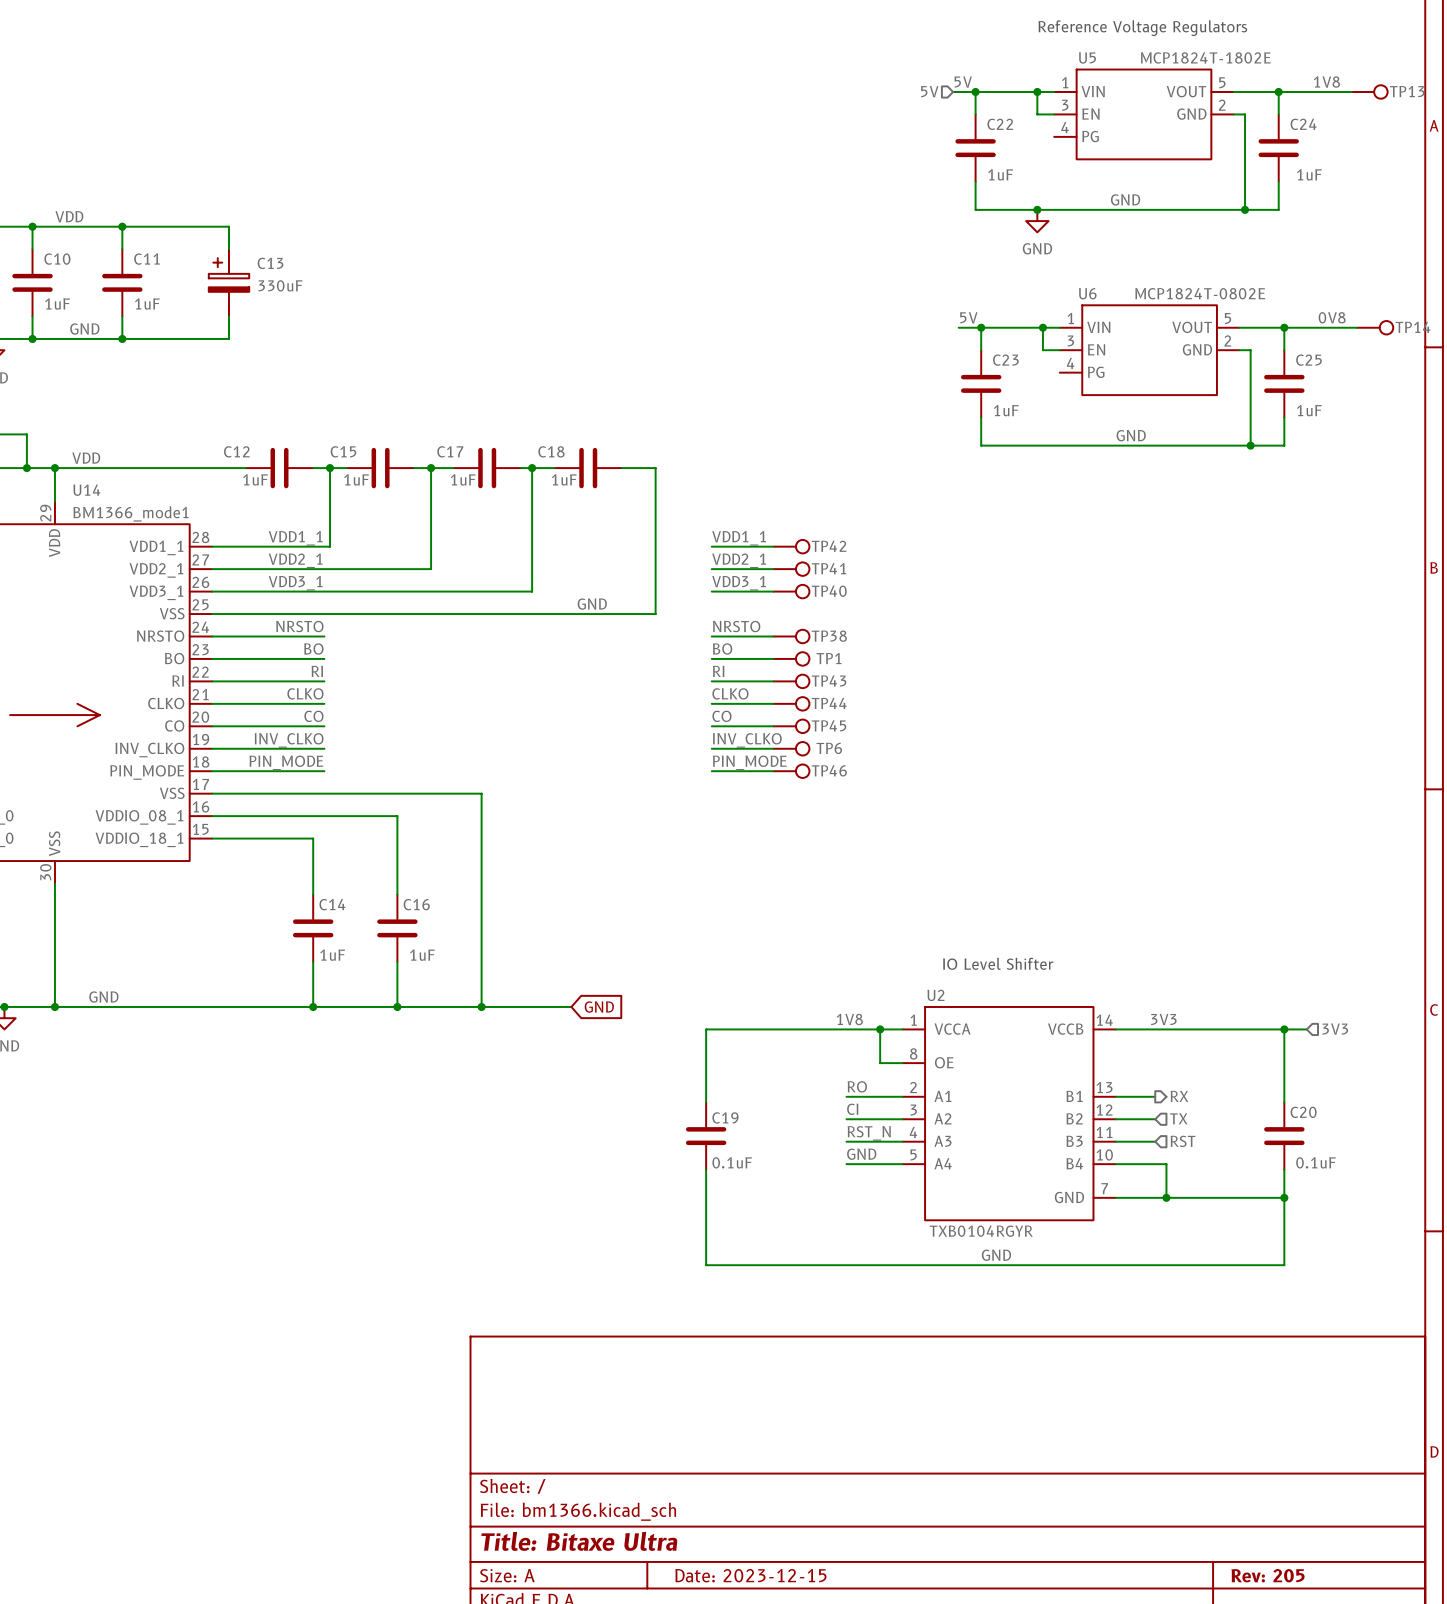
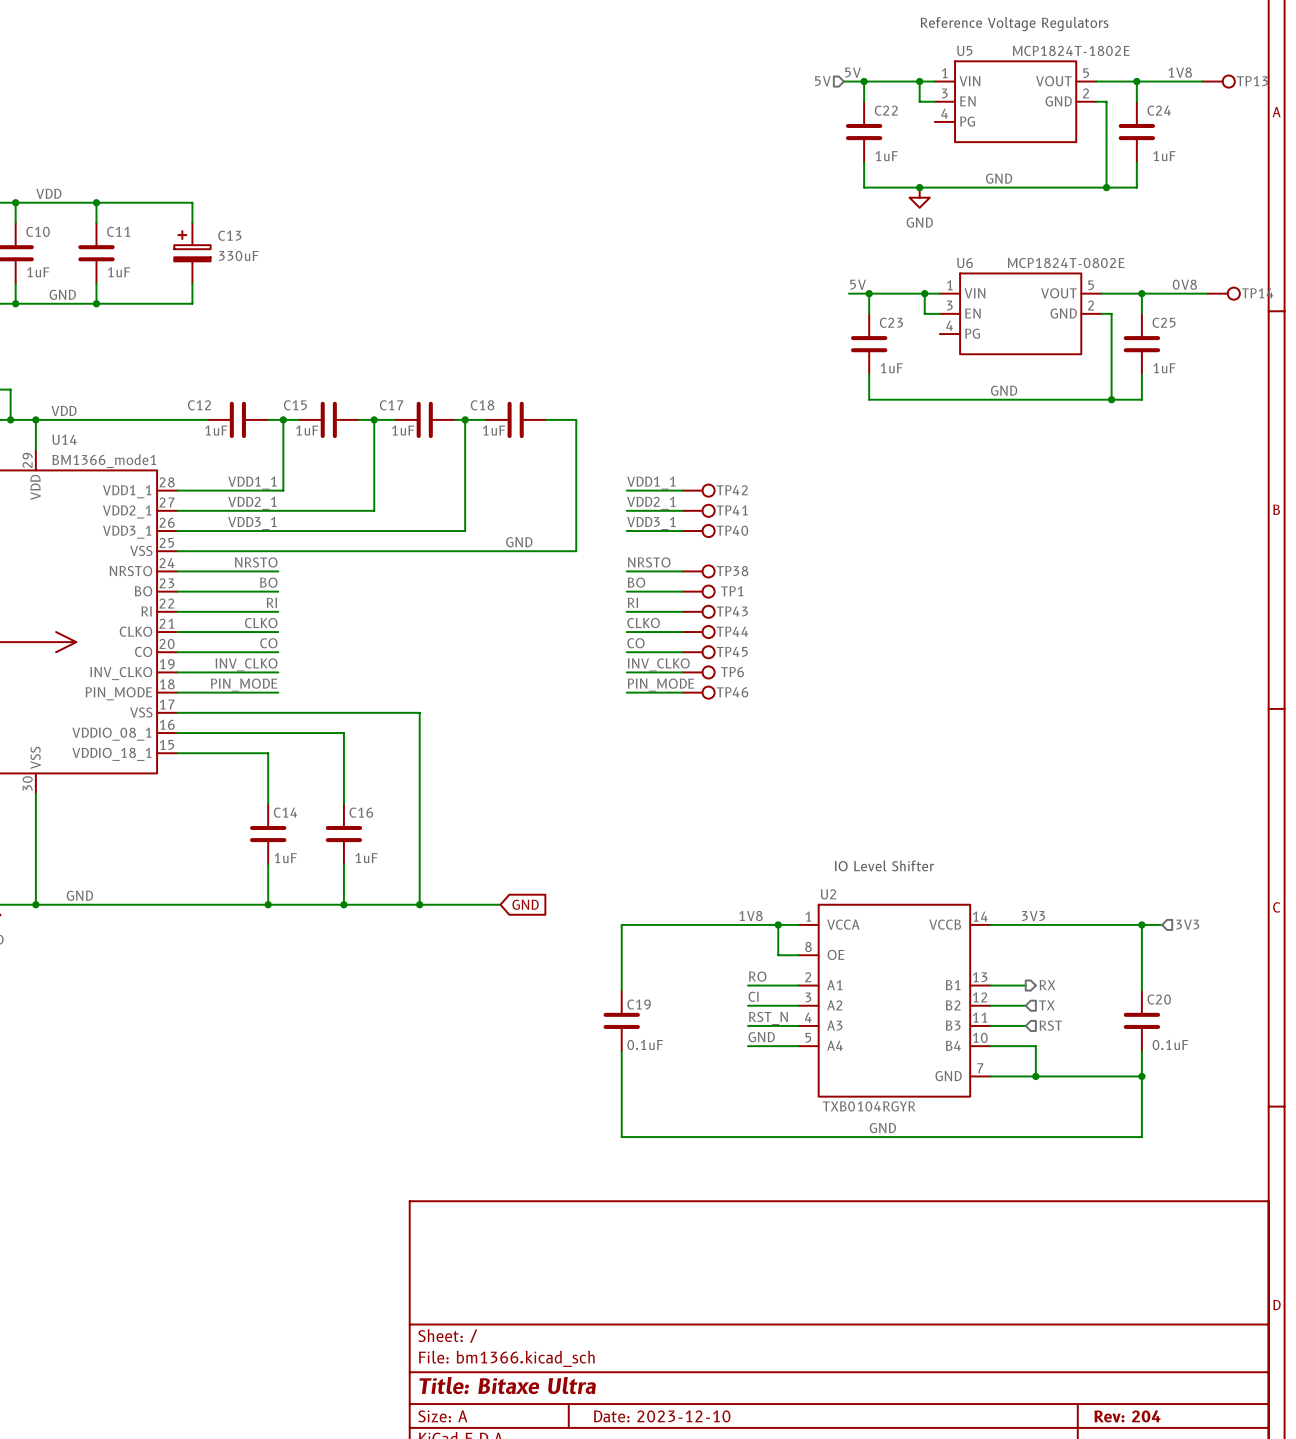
title block: Date: 2023-12-15 (750, 1575) -> Date: 2023-12-10 (662, 1416)
title block: Rev: 205 (1268, 1575) -> Rev: 204 (1127, 1416)

